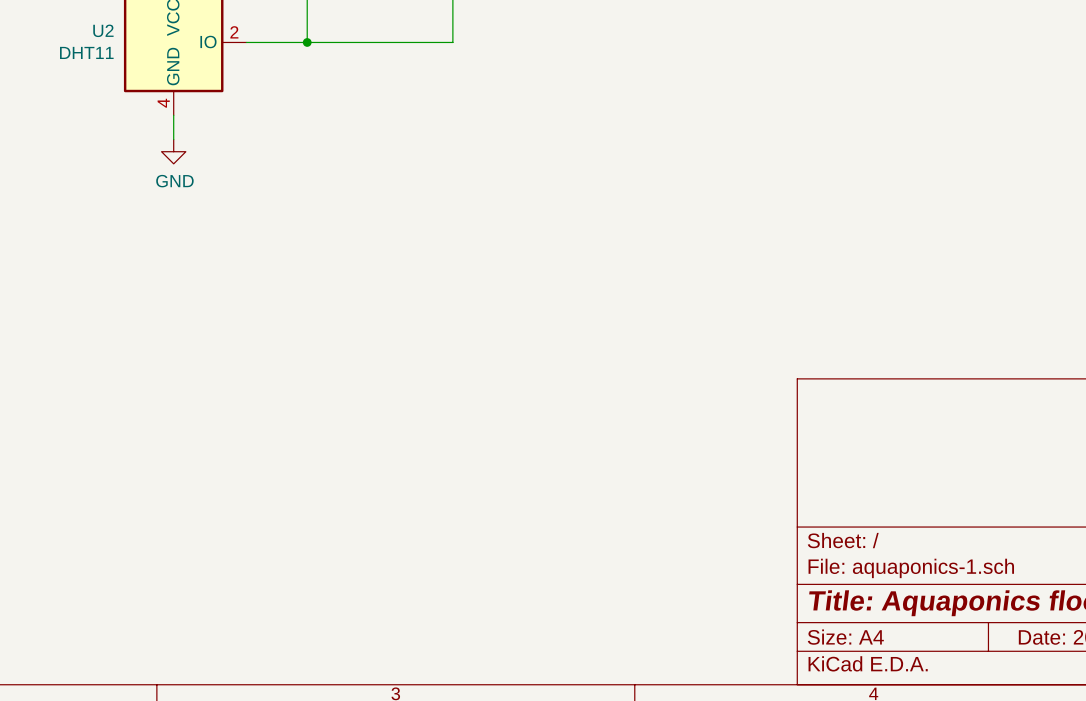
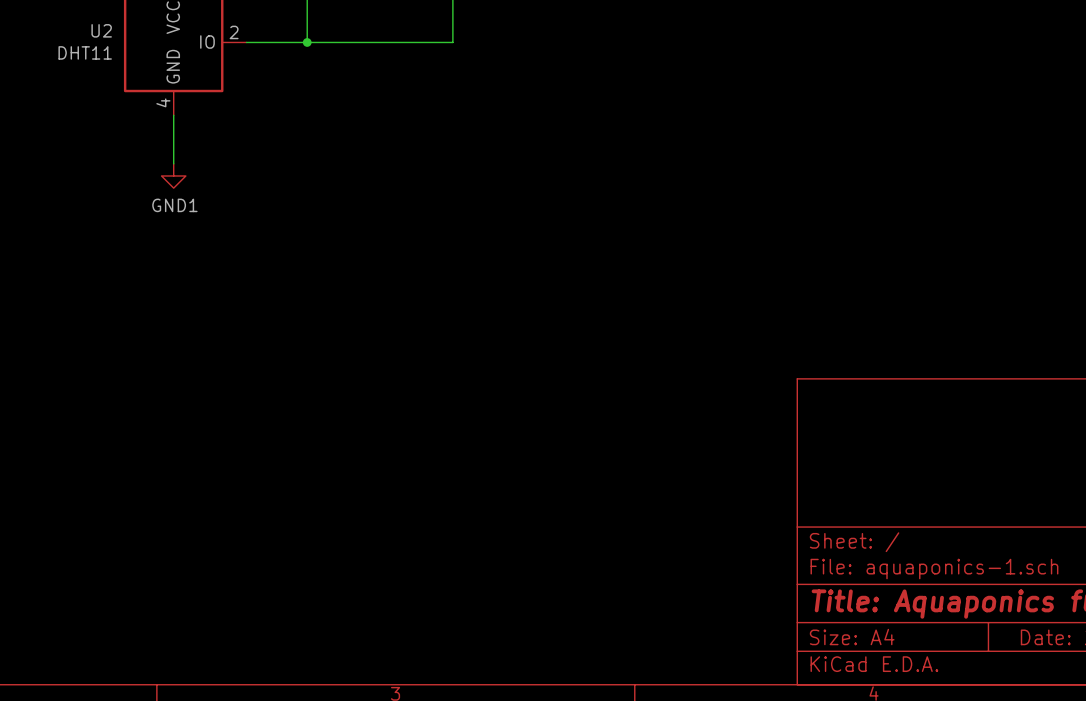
power symbol: GND (173, 151) -> none
power symbol: none -> GND1 (173, 175)

